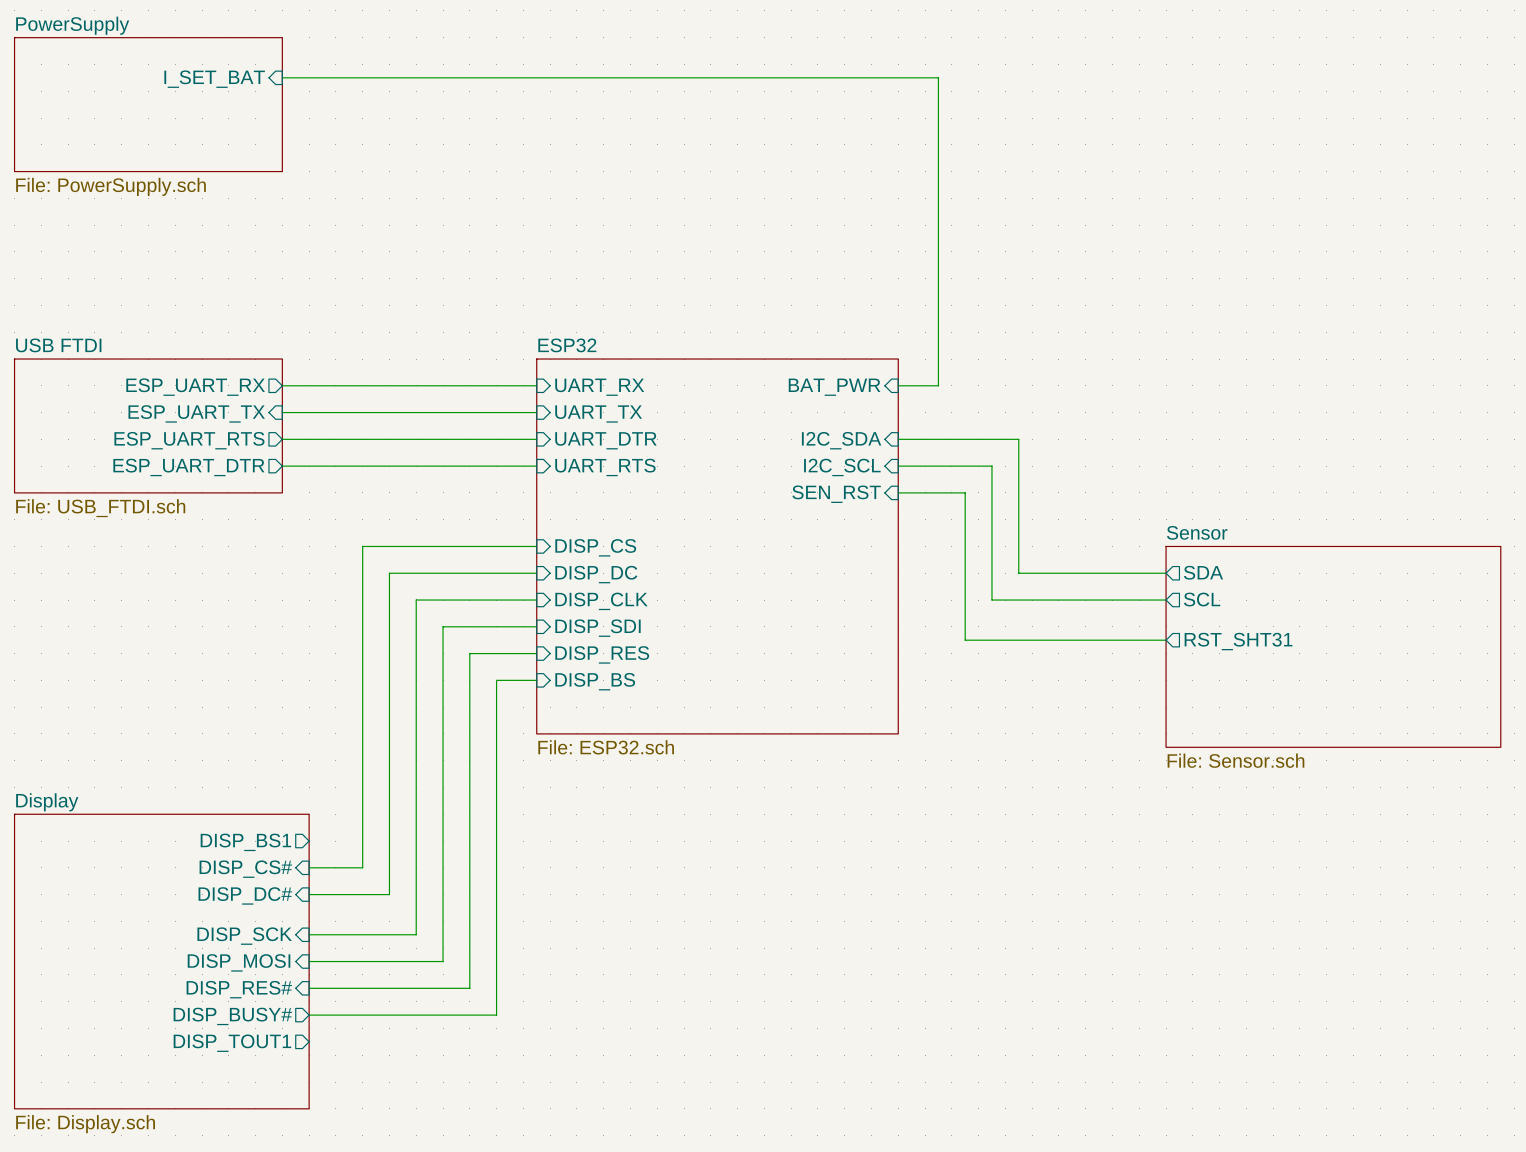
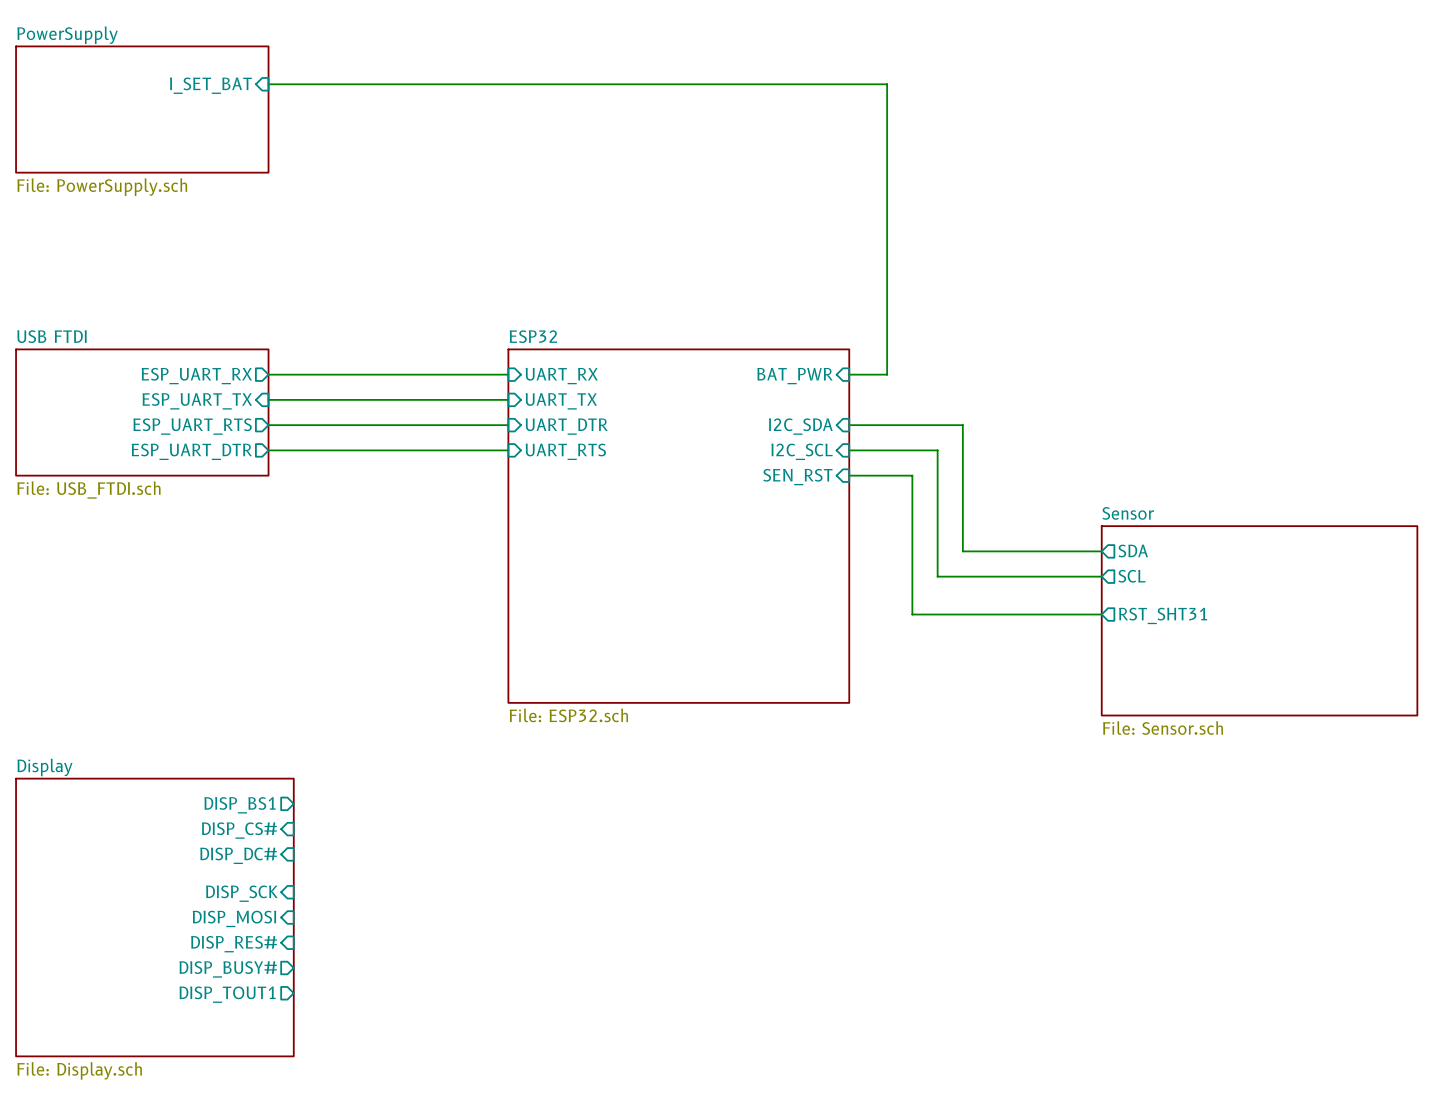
wire: (536, 546) (362, 546) (362, 867) (309, 867) -> none
sheet pin: DISP_CS (595, 547) -> none
wire: (536, 573) (389, 573) (389, 894) (309, 894) -> none
sheet pin: DISP_DC (596, 574) -> none
wire: (536, 600) (416, 600) (416, 934) (309, 934) -> none
sheet pin: DISP_CLK (601, 601) -> none
wire: (536, 626) (443, 626) (443, 961) (309, 961) -> none
sheet pin: DISP_SDI (597, 628) -> none
wire: (536, 653) (469, 653) (469, 988) (309, 988) -> none
sheet pin: DISP_RES (602, 654) -> none
wire: (536, 680) (496, 680) (496, 1015) (309, 1015) -> none
sheet pin: DISP_BS (595, 681) -> none

